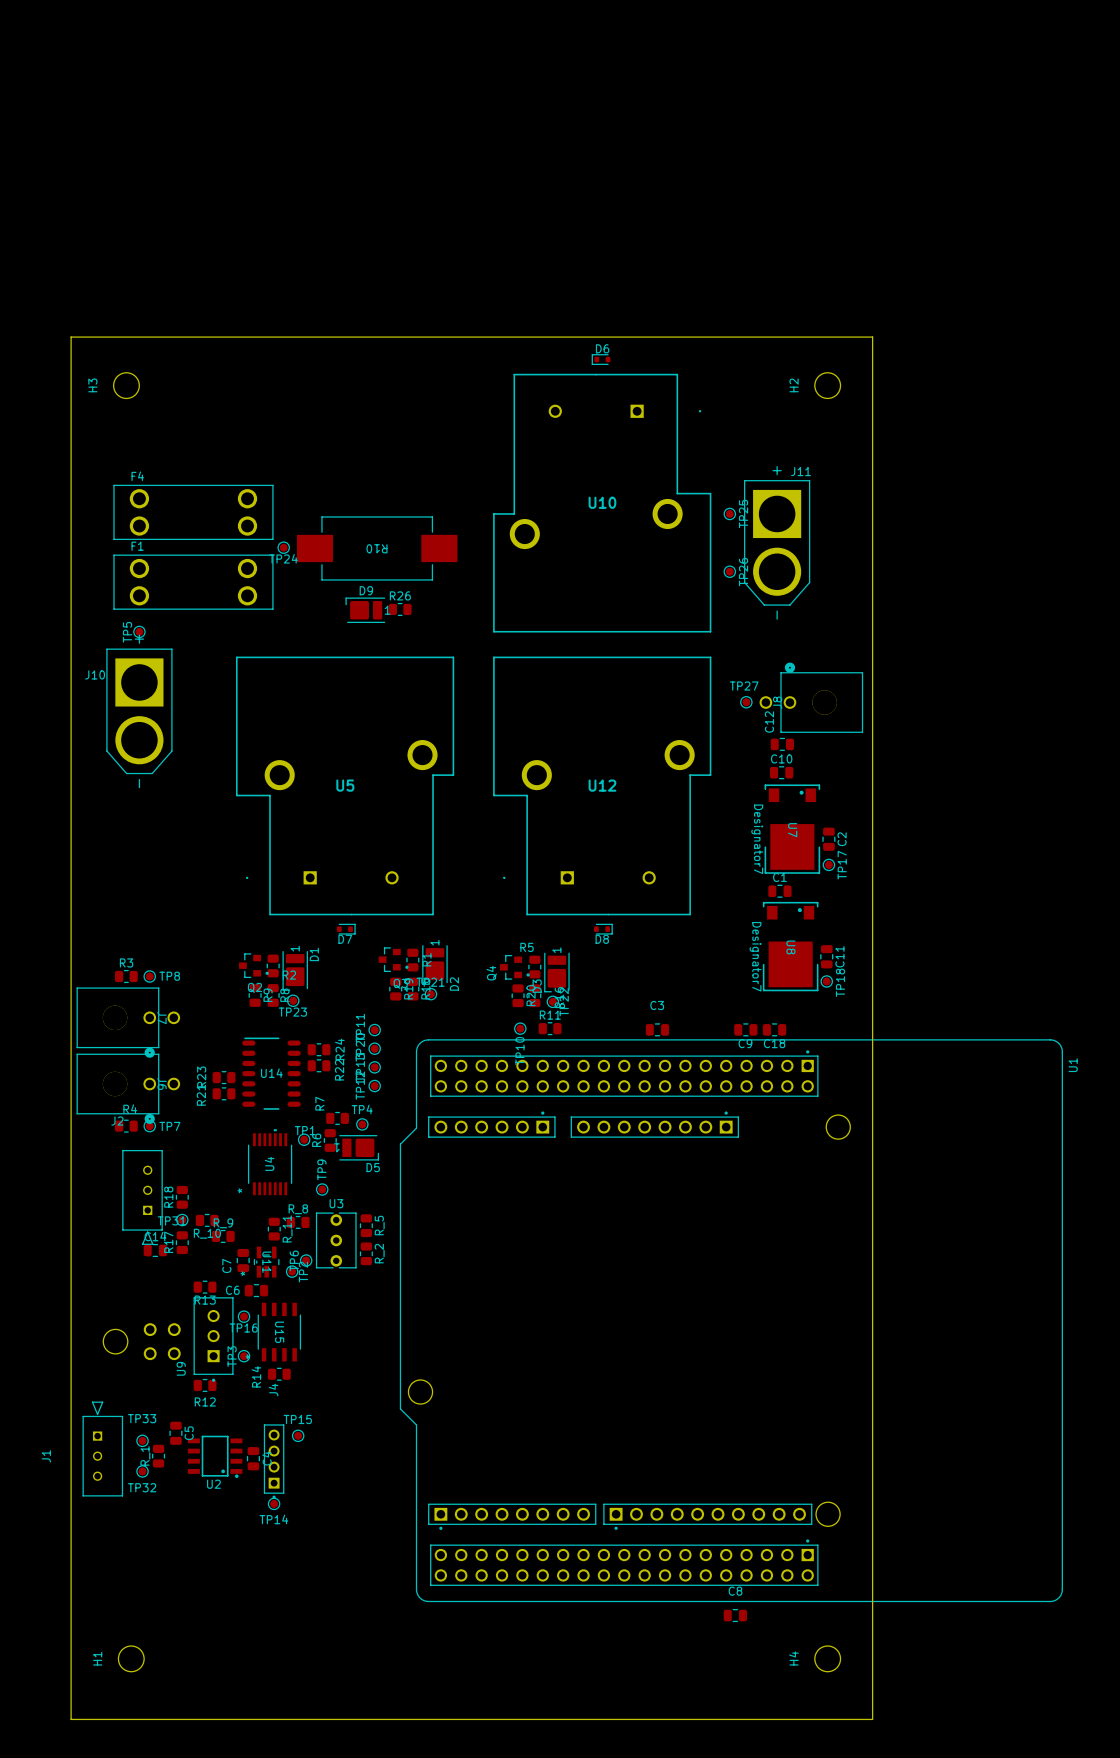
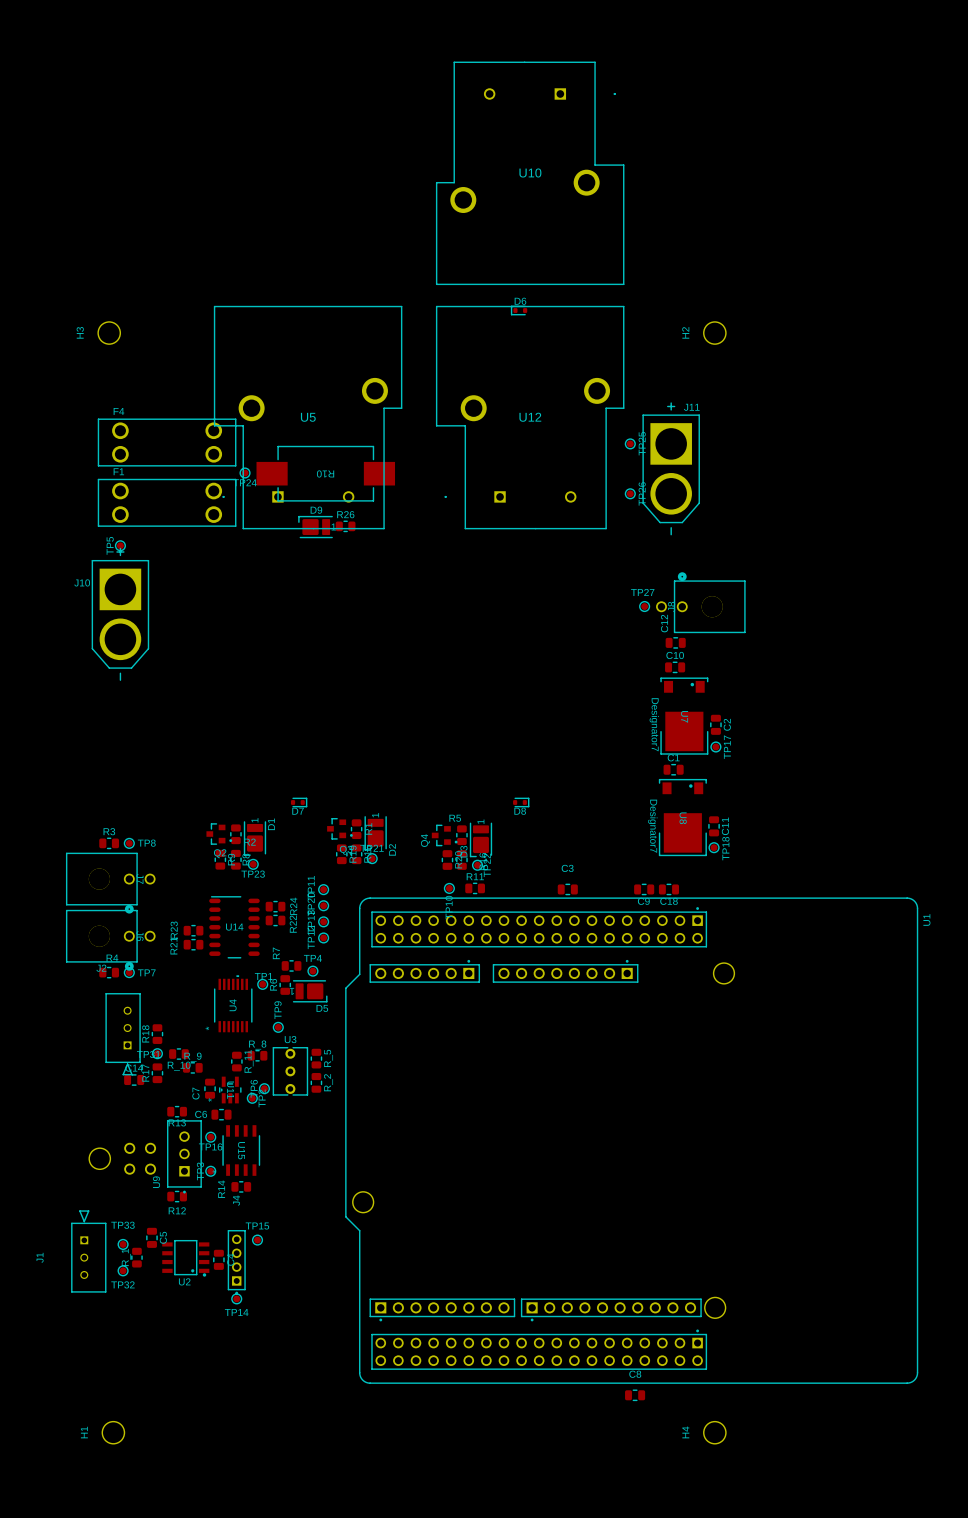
board edge: (71, 337) (872, 337) (872, 1719) (71, 1719) (71, 337) -> none
U10 position: (602, 503) -> (530, 173)
U5 position: (345, 785) -> (308, 417)
U12 position: (602, 785) -> (530, 417)

